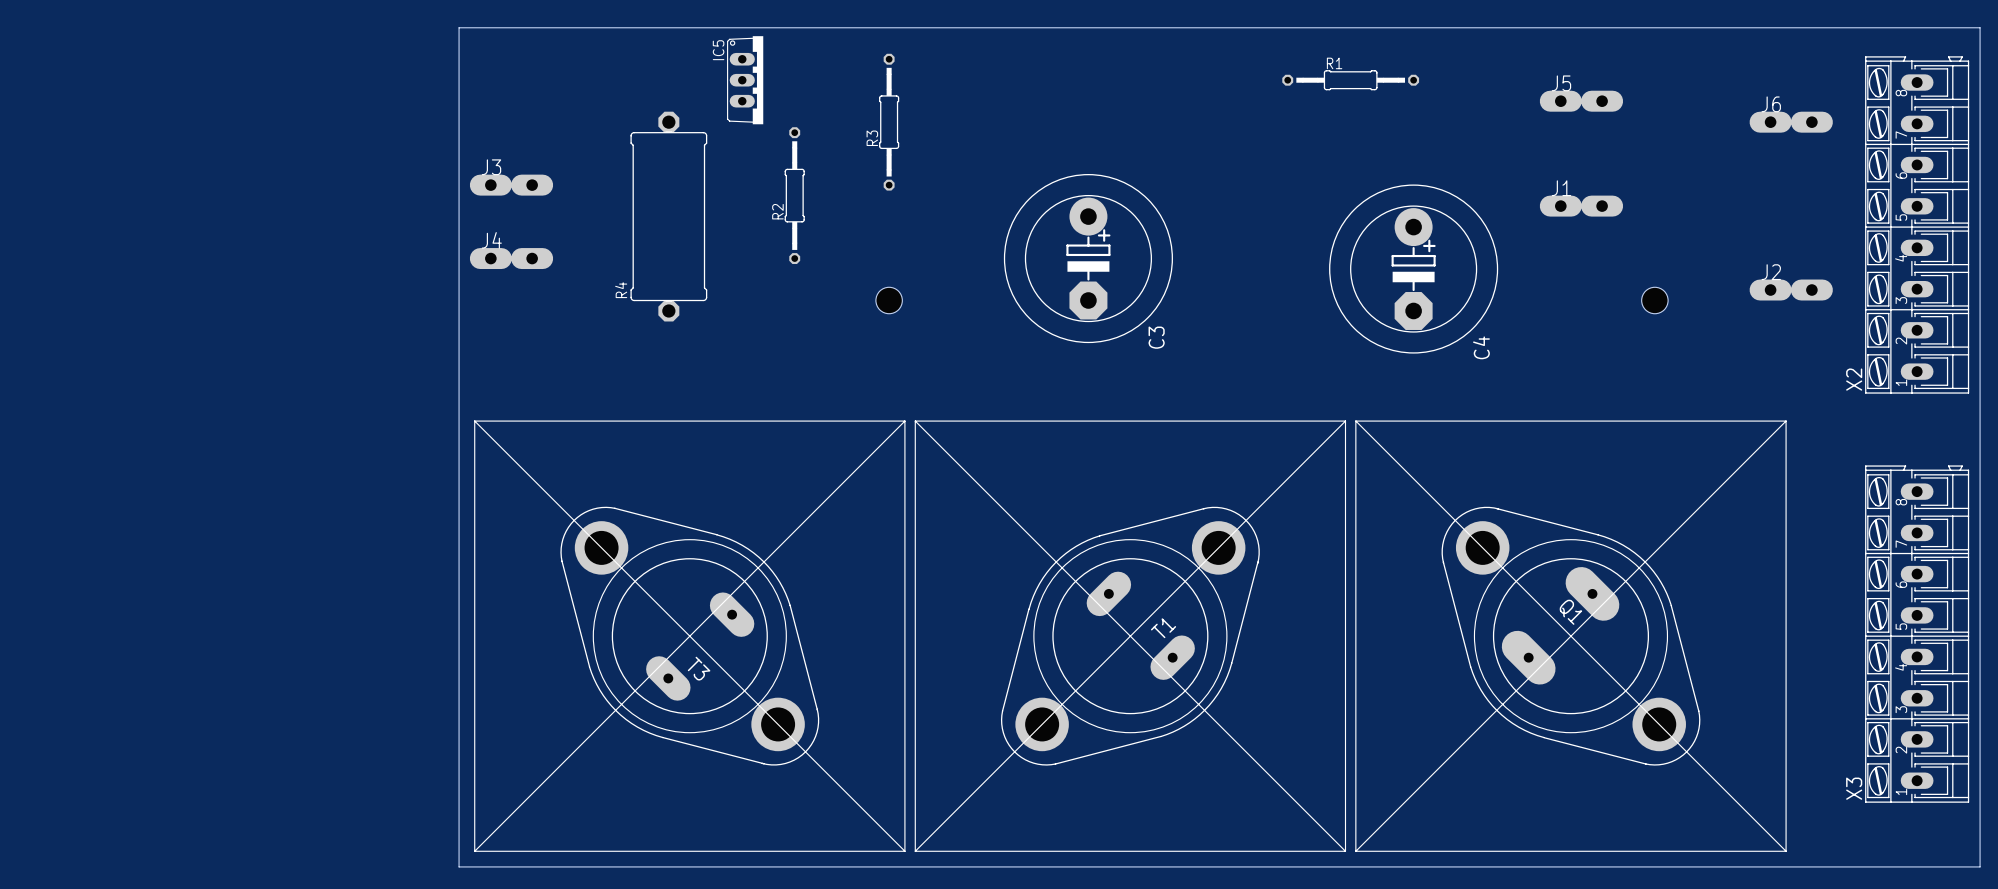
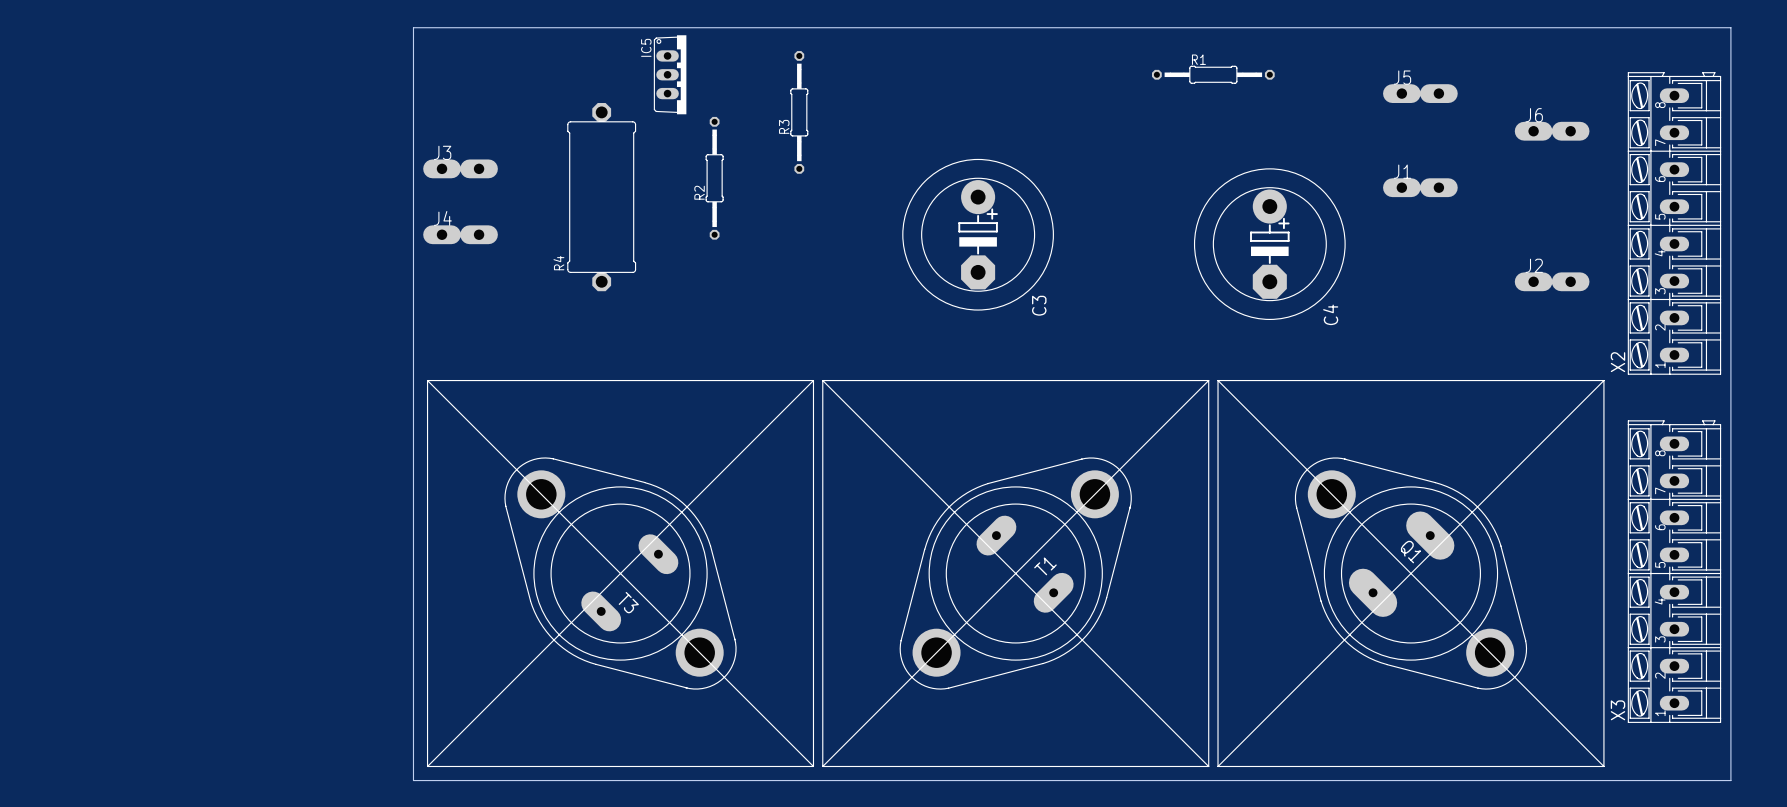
board edge: (1927, 27) (1980, 27) (1980, 866) (1927, 866) -> (1730, 27) (1730, 780)
J6 position: (1791, 122) -> (1552, 131)
X2 position: (1917, 224) -> (1674, 223)
J2 position: (1791, 290) -> (1552, 281)
hole: (889, 300) -> none
hole: (1654, 300) -> none
X3 position: (1917, 634) -> (1674, 571)

